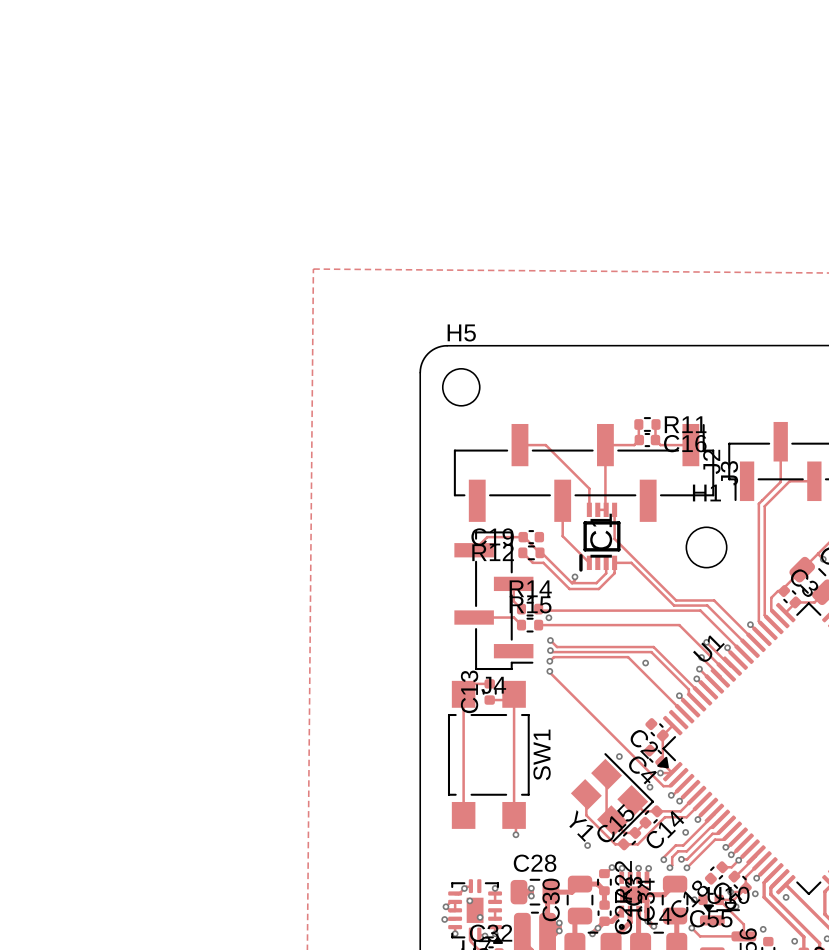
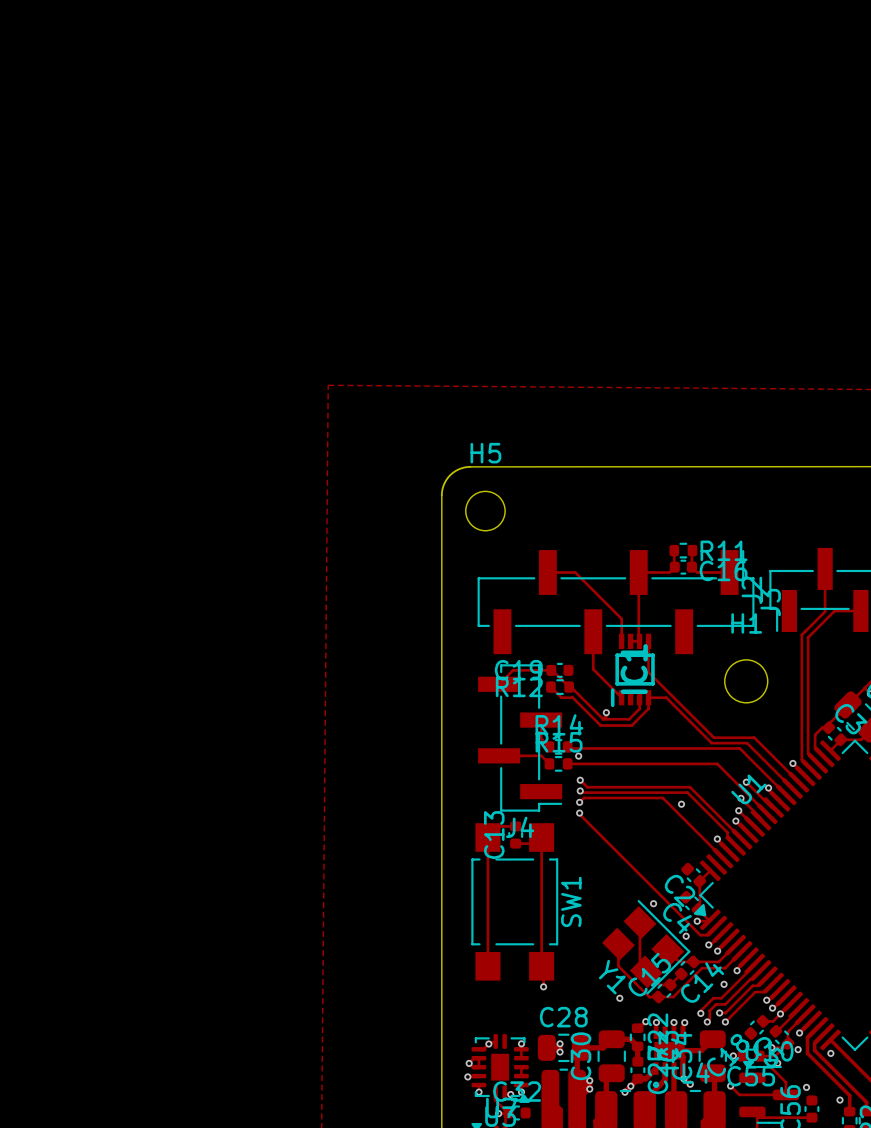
via: (469, 900) -> none
via: (480, 917) -> none

